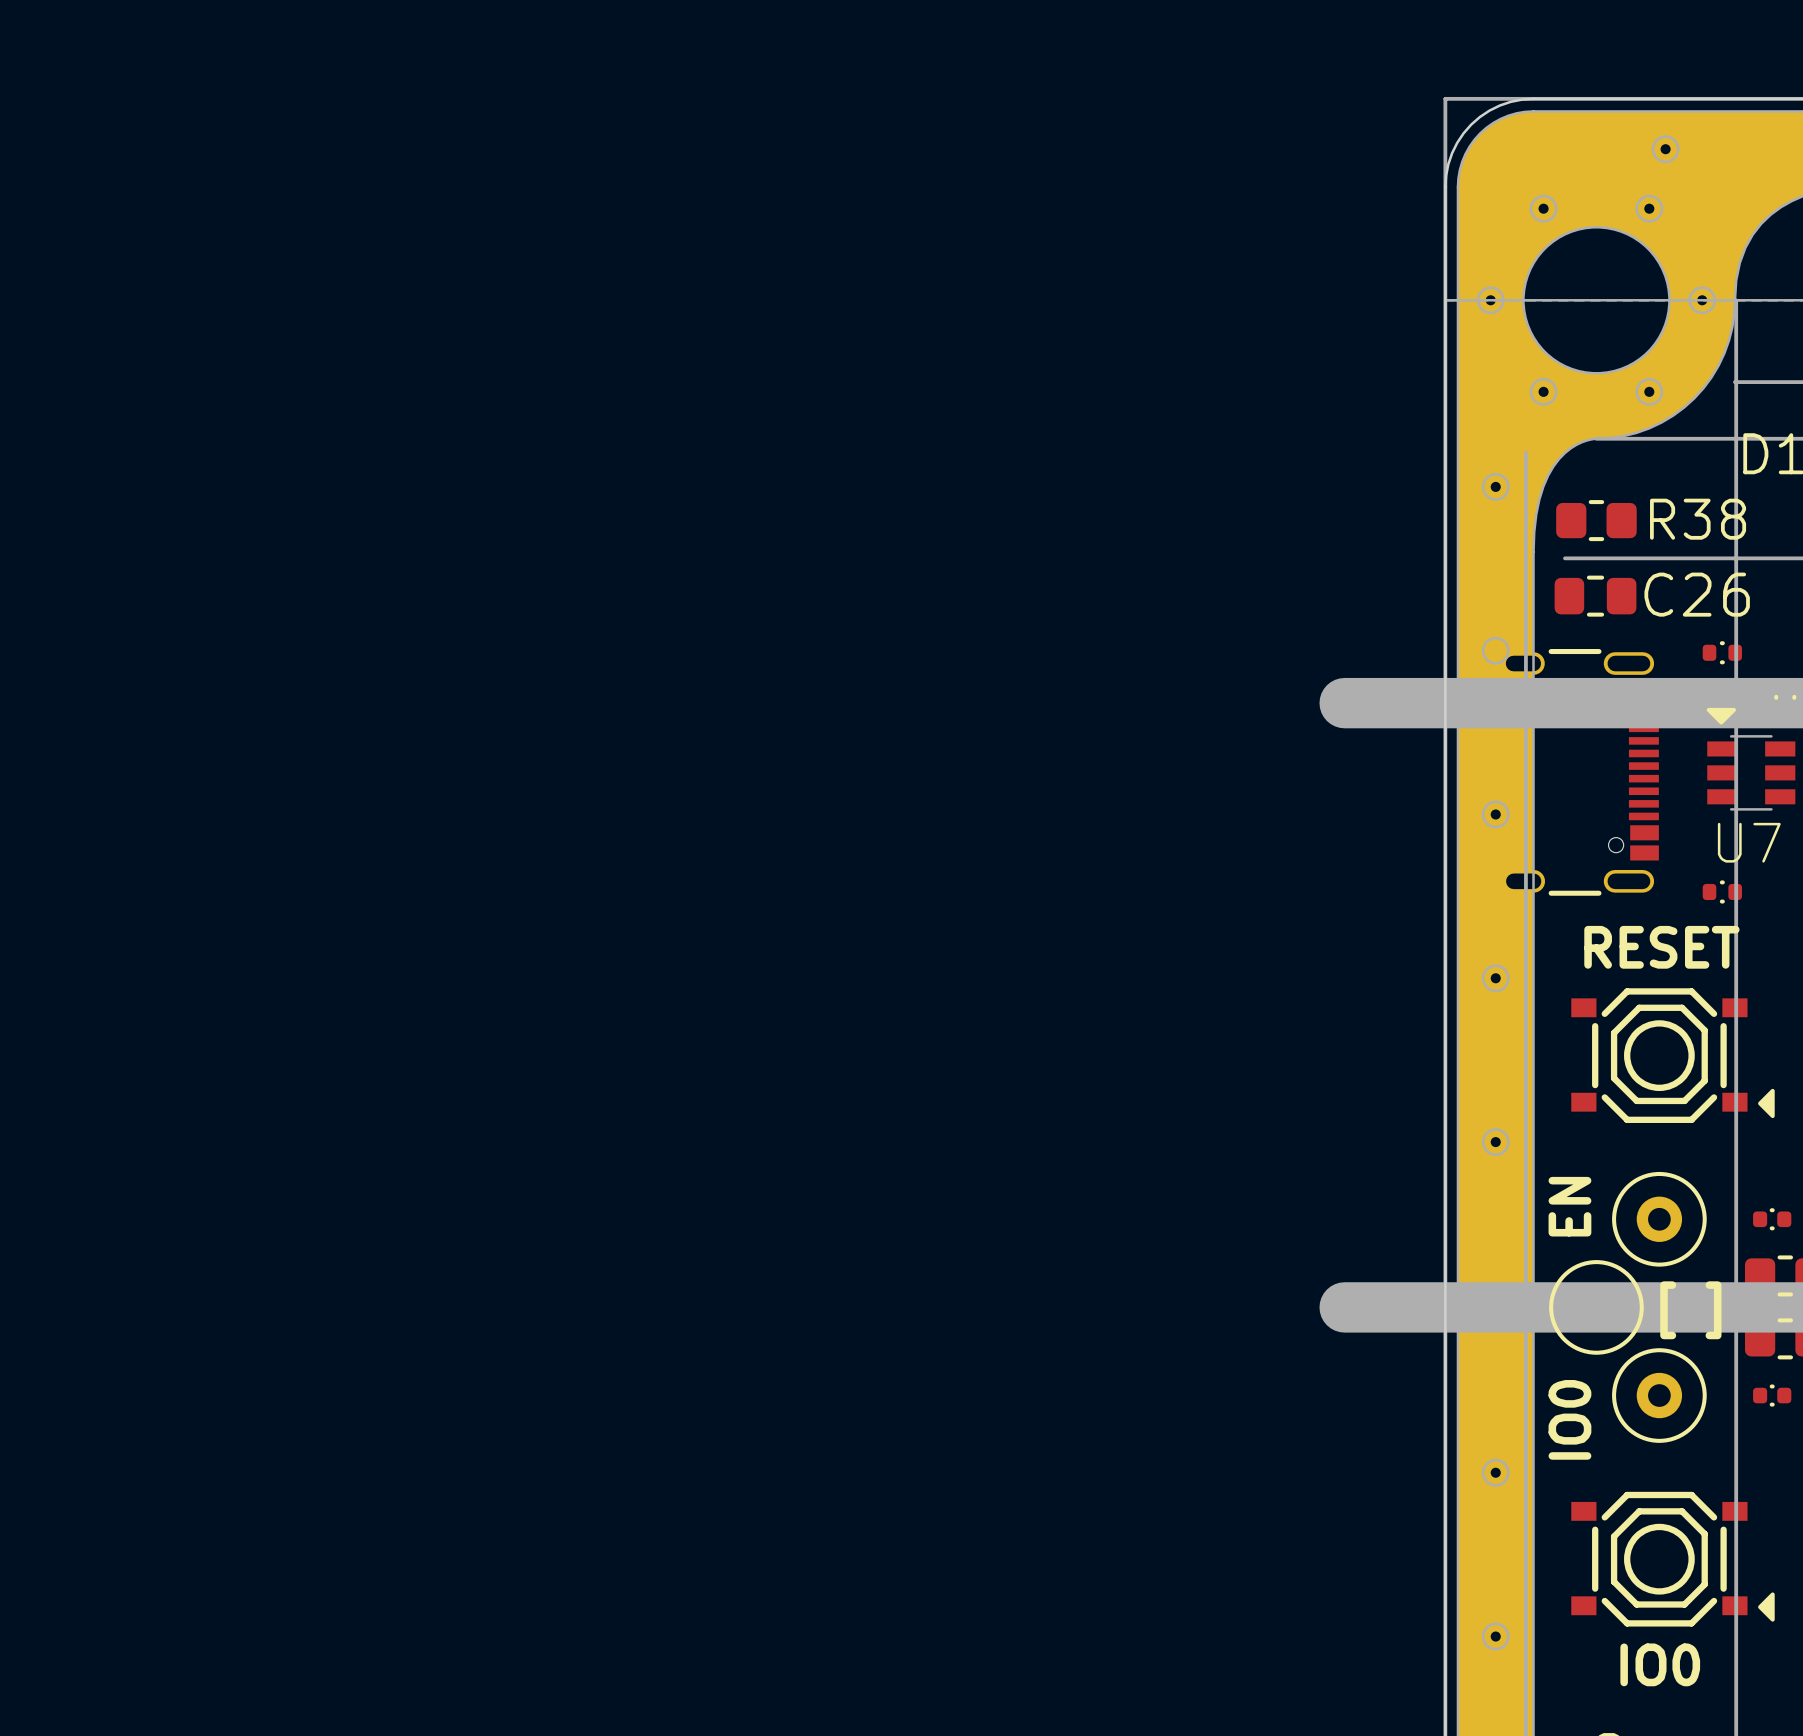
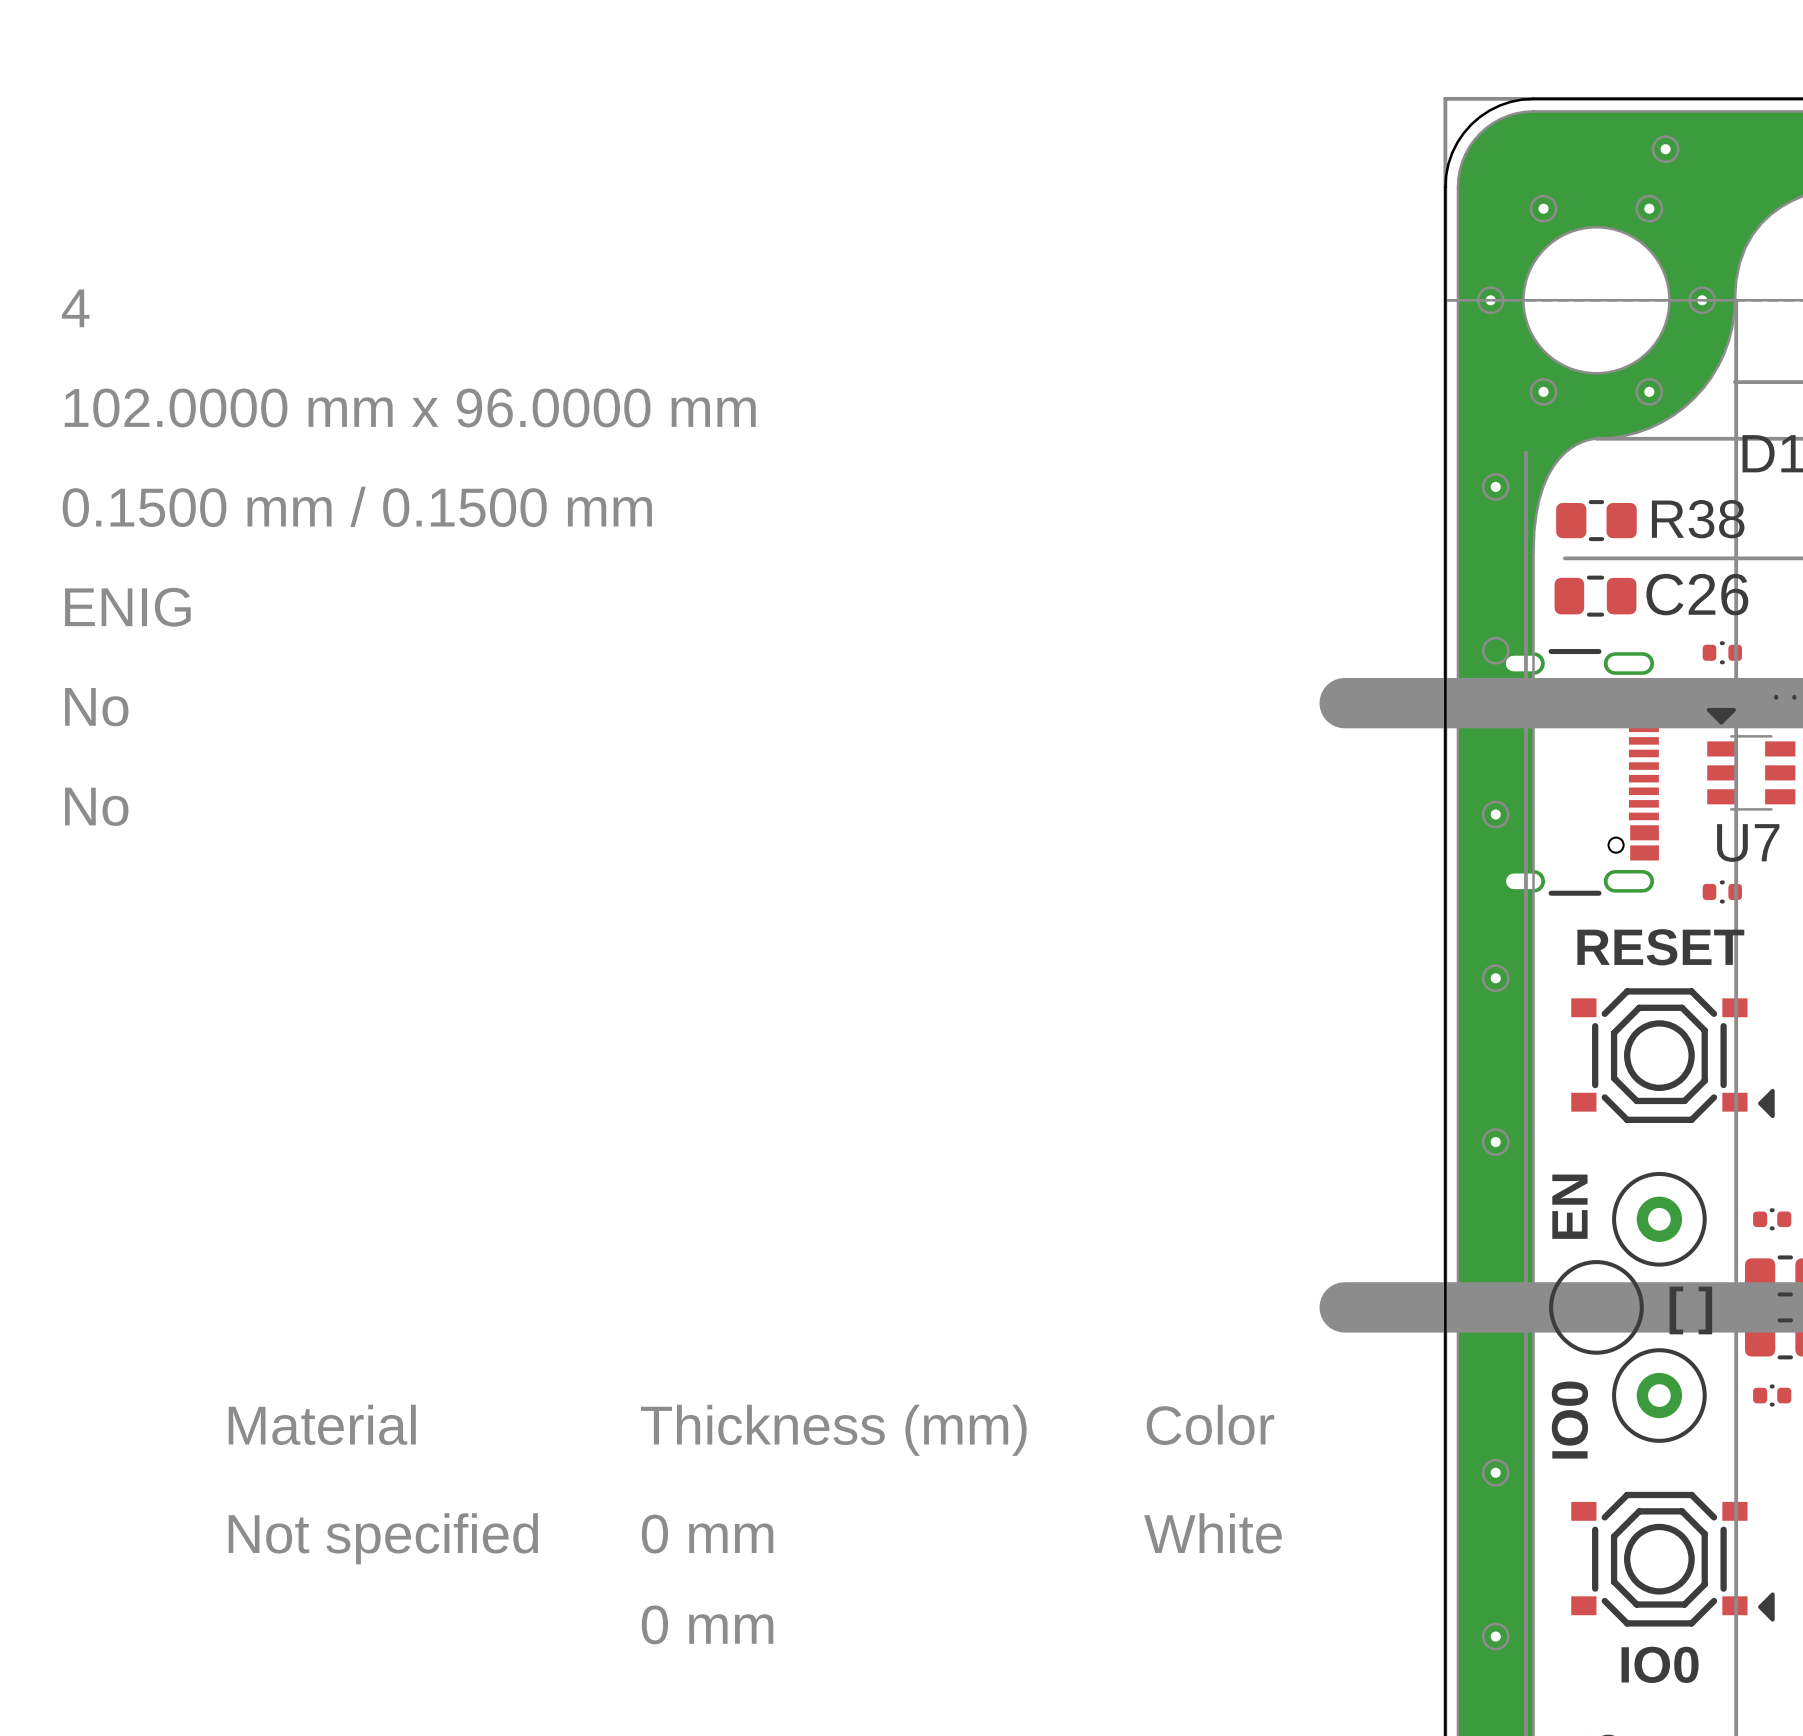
text: none -> 4 (75, 308)
text: none -> 102.0000 mm x 96.0000 mm (410, 407)
text: none -> 0.1500 mm / 0.1500 mm (357, 506)
text: none -> ENIG (127, 607)
text: none -> No (96, 707)
text: none -> No (96, 806)
text: none -> Material (322, 1424)
text: none -> Color (1210, 1424)
text: none -> Thickness (mm) (833, 1430)
text: none -> 0 mm (707, 1534)
text: none -> White (1213, 1533)
text: none -> Not specified (383, 1538)
text: none -> 0 mm (707, 1624)

